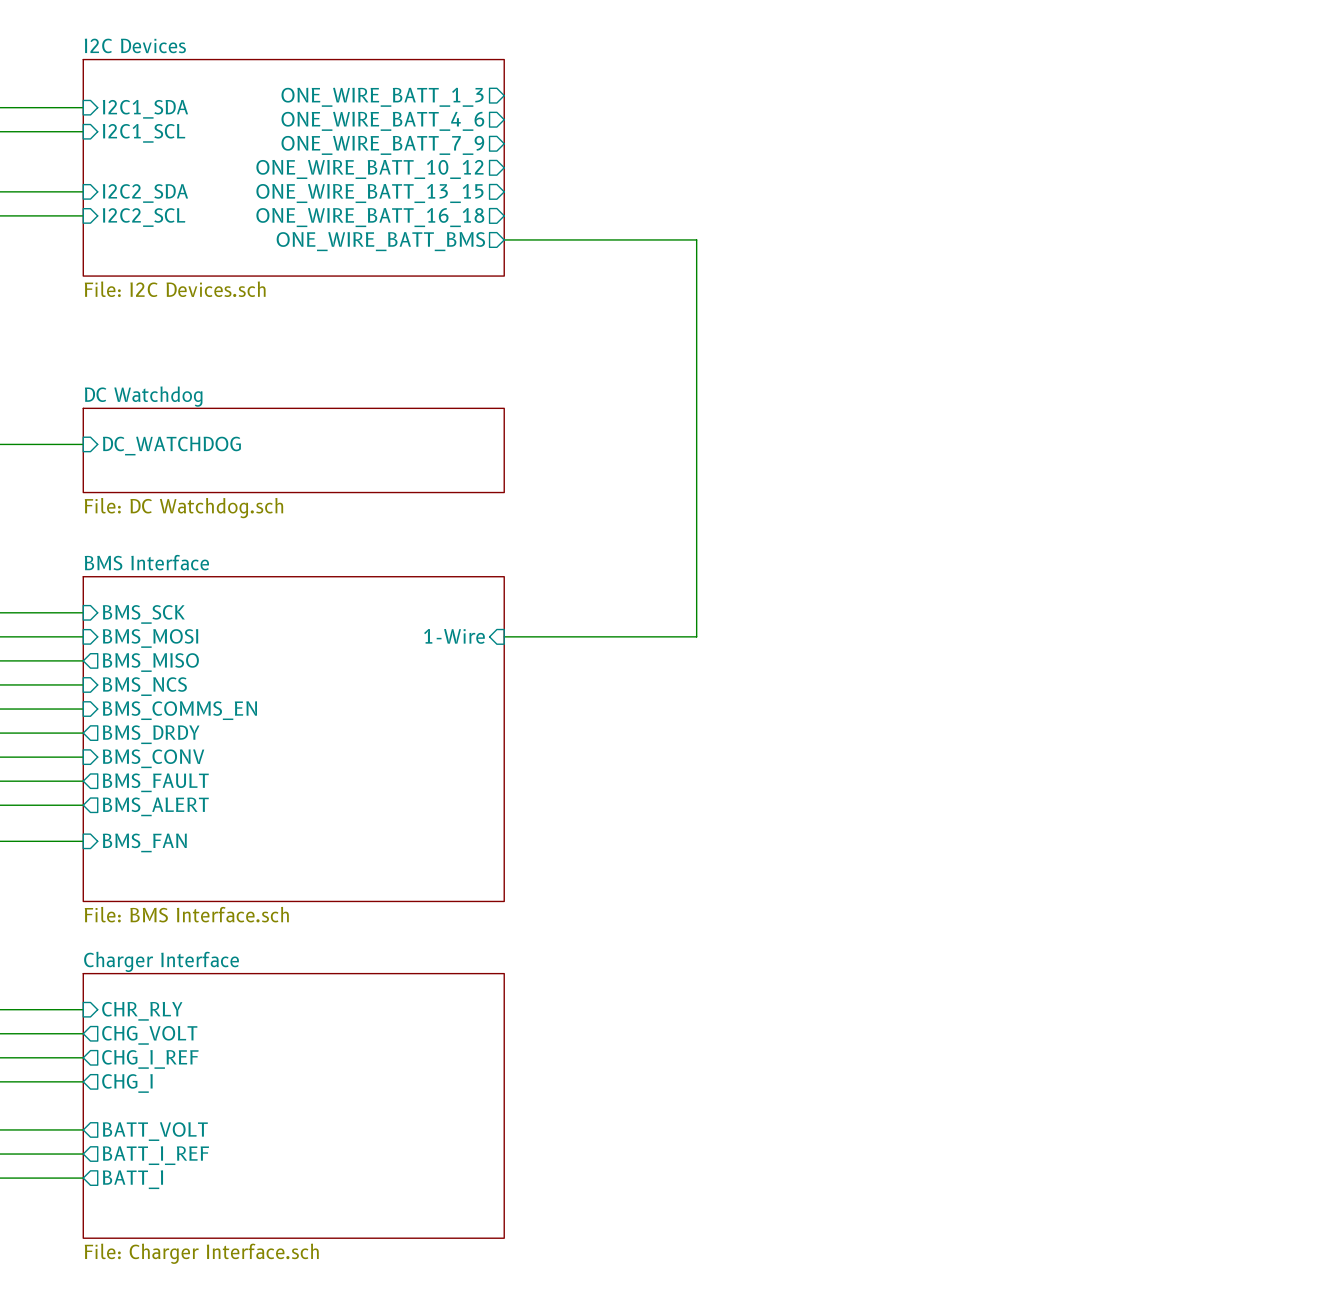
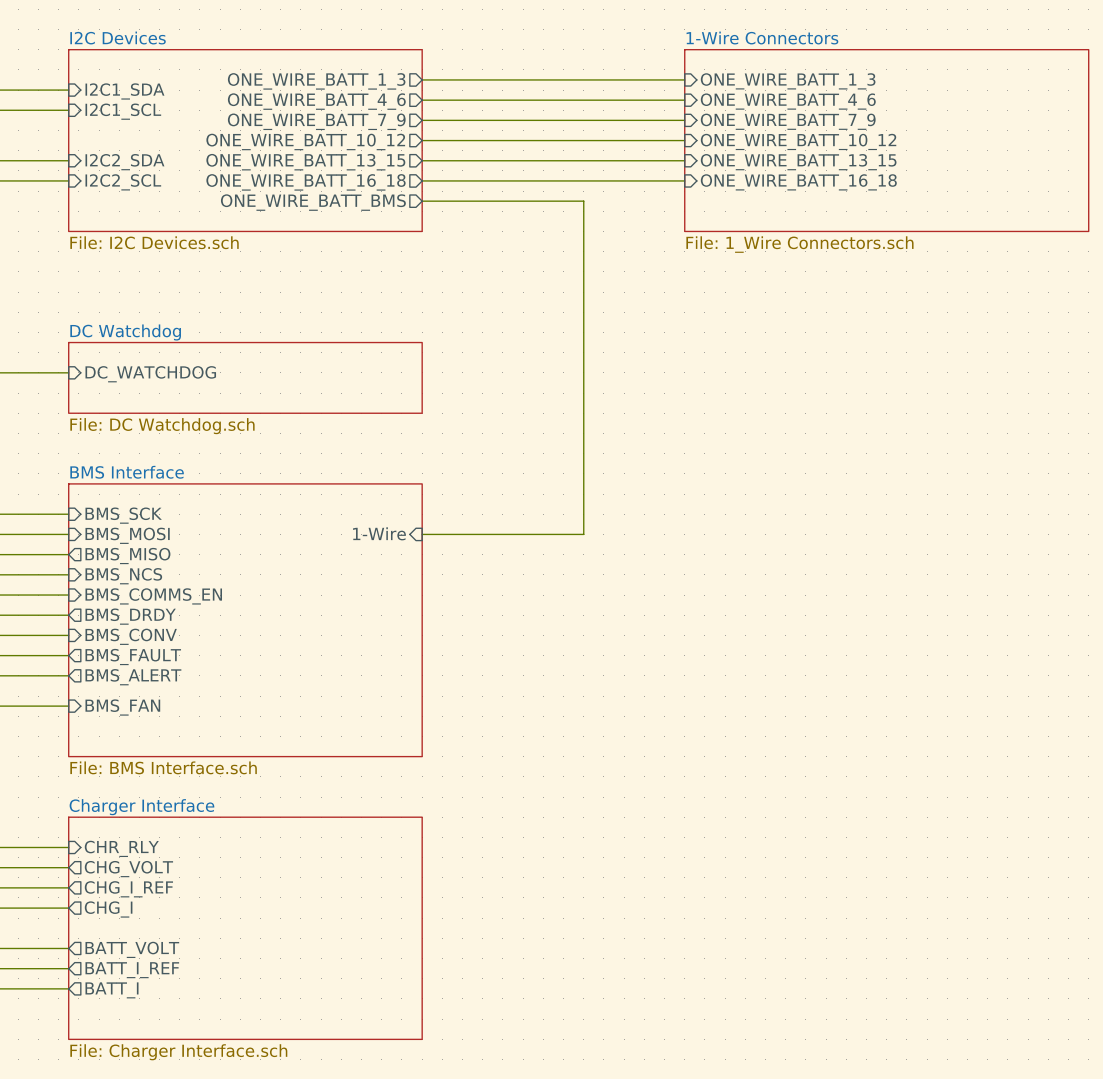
wire: none -> (422, 79) (684, 79)
sheet pin: none -> ONE_WIRE_BATT_1_3 (788, 81)
wire: none -> (422, 100) (684, 100)
sheet pin: none -> ONE_WIRE_BATT_4_6 (788, 101)
wire: none -> (422, 120) (684, 120)
sheet pin: none -> ONE_WIRE_BATT_7_9 (788, 121)
wire: none -> (422, 140) (684, 140)
sheet 1-Wire Connectors: none -> File: 1_Wire Connectors.sch (886, 140)
sheet pin: none -> ONE_WIRE_BATT_10_12 (798, 141)
wire: none -> (422, 160) (684, 160)
sheet pin: none -> ONE_WIRE_BATT_13_15 (798, 162)
wire: none -> (422, 180) (684, 180)
sheet pin: none -> ONE_WIRE_BATT_16_18 (798, 182)

